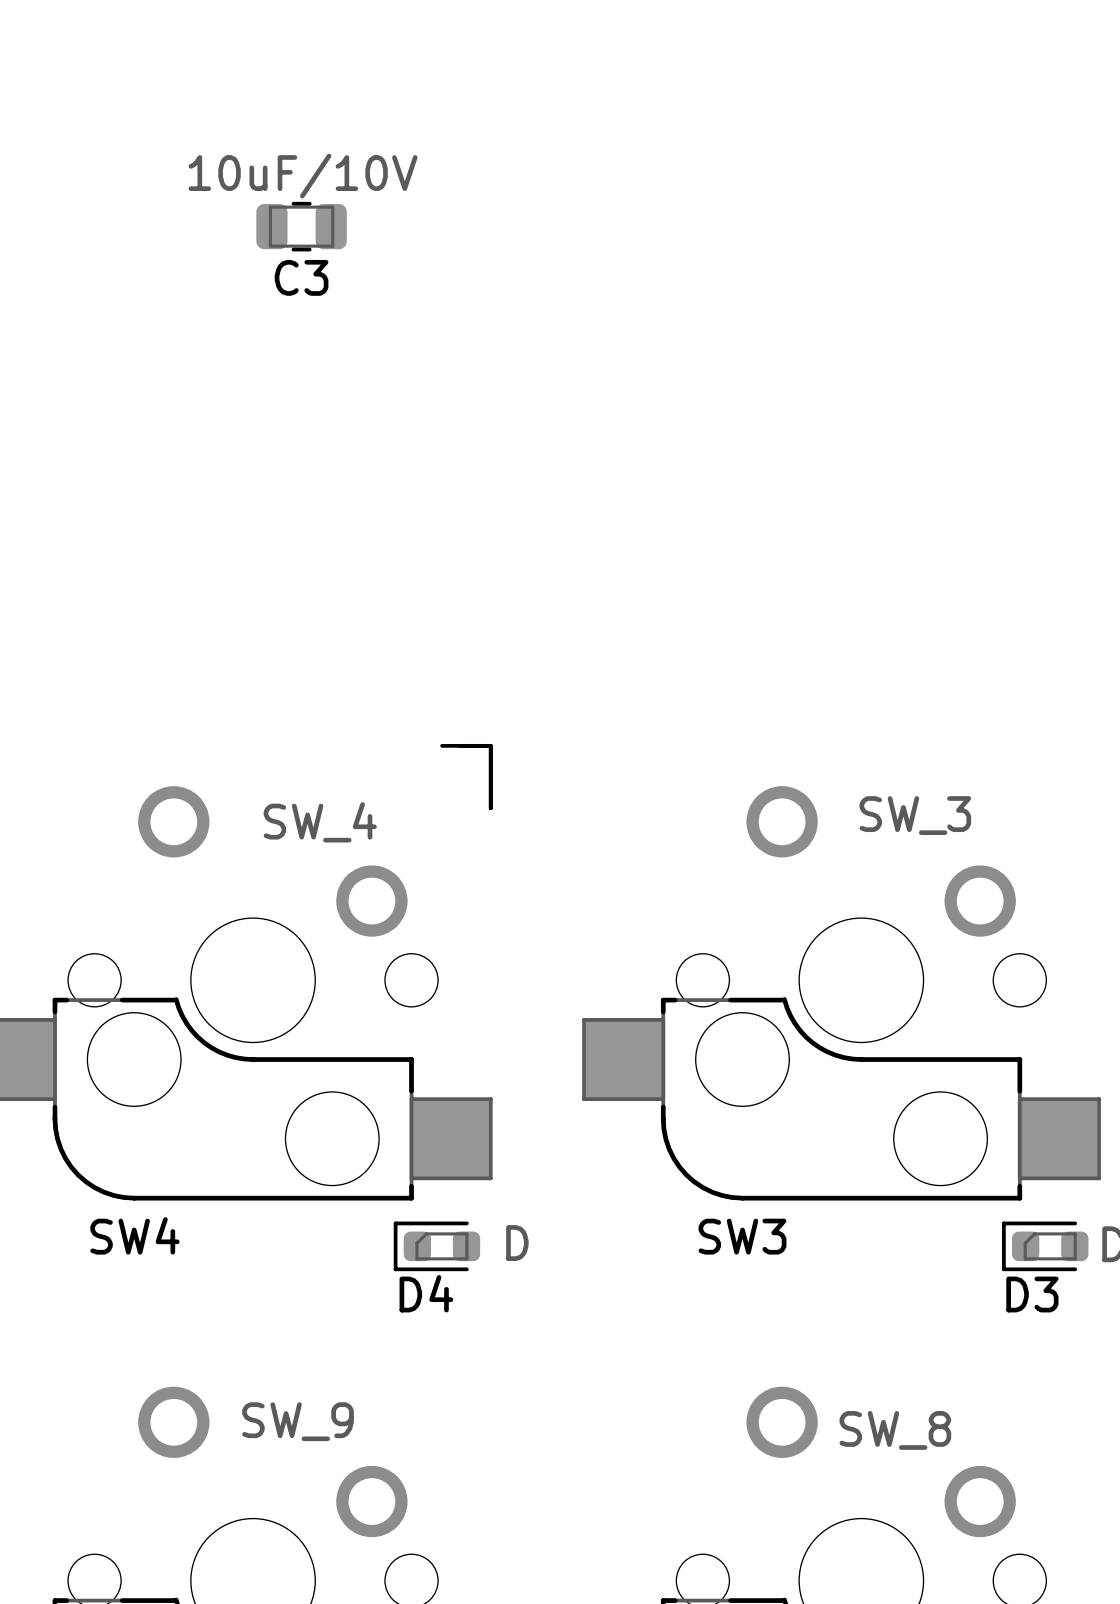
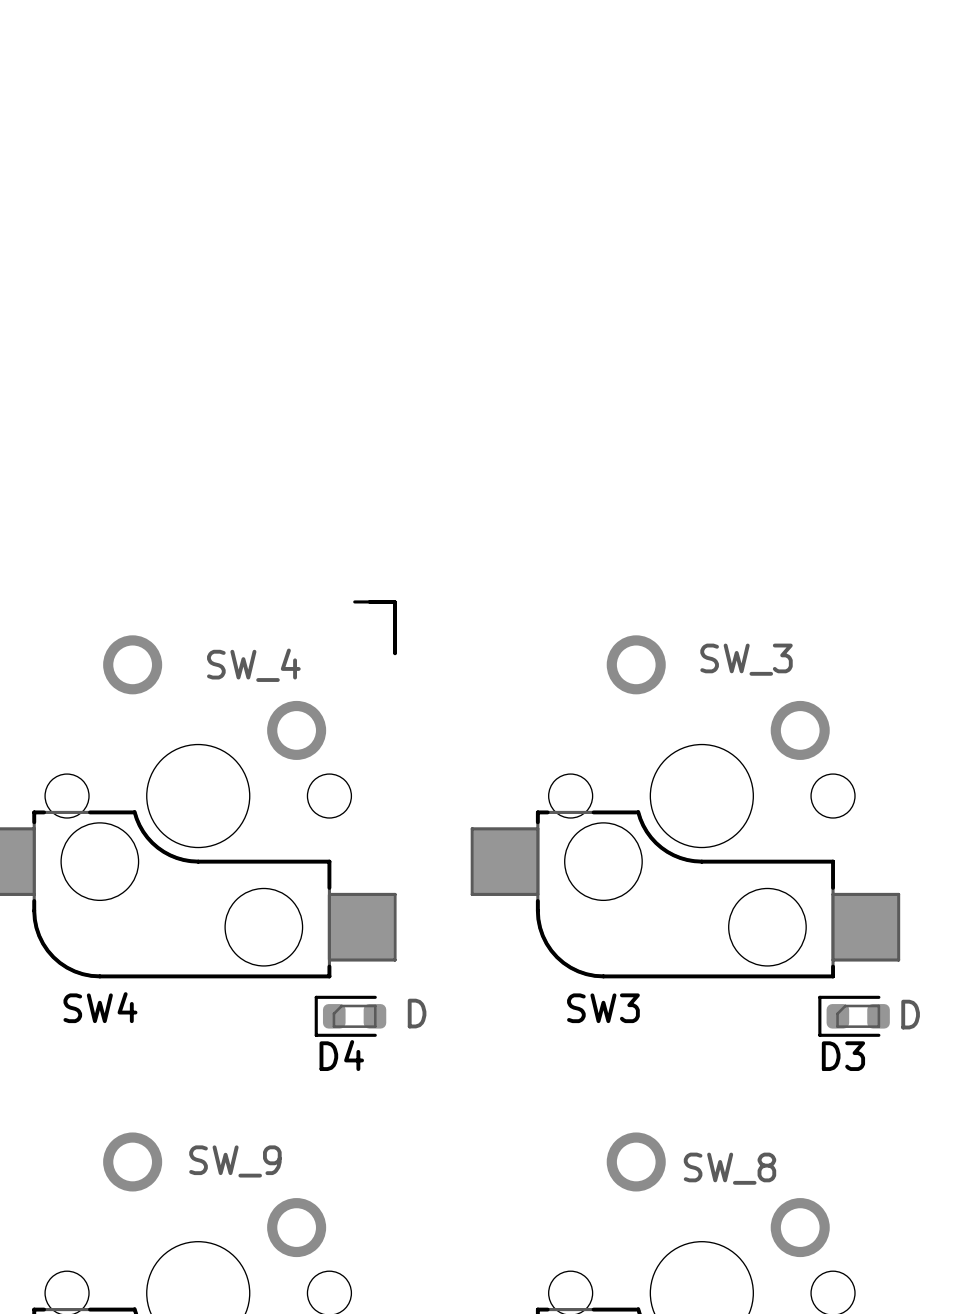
C3: 10uF/10V (301, 226) -> none

